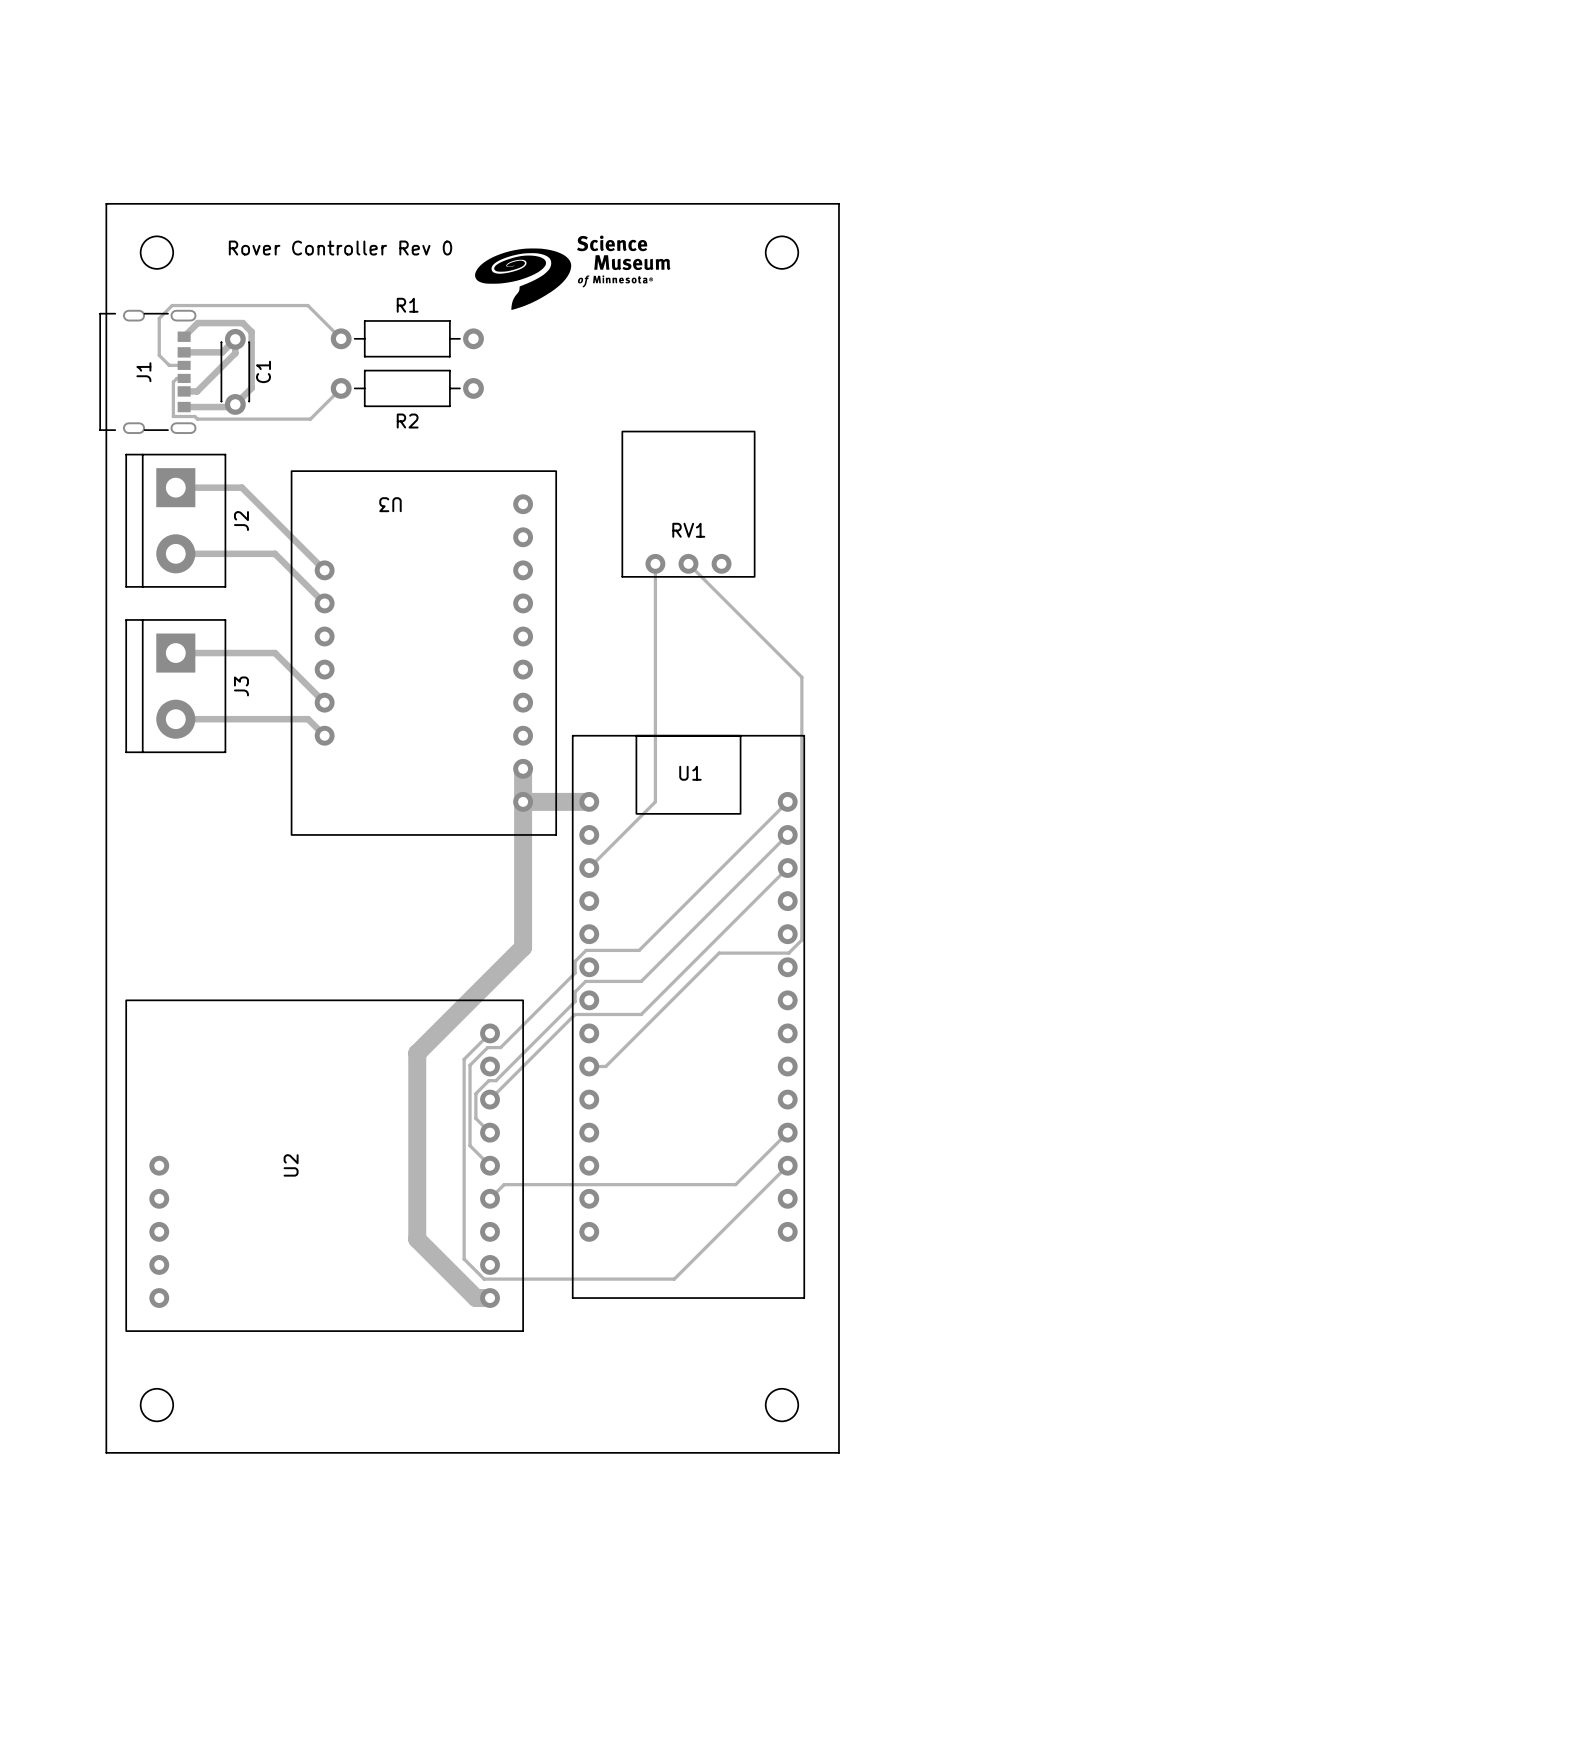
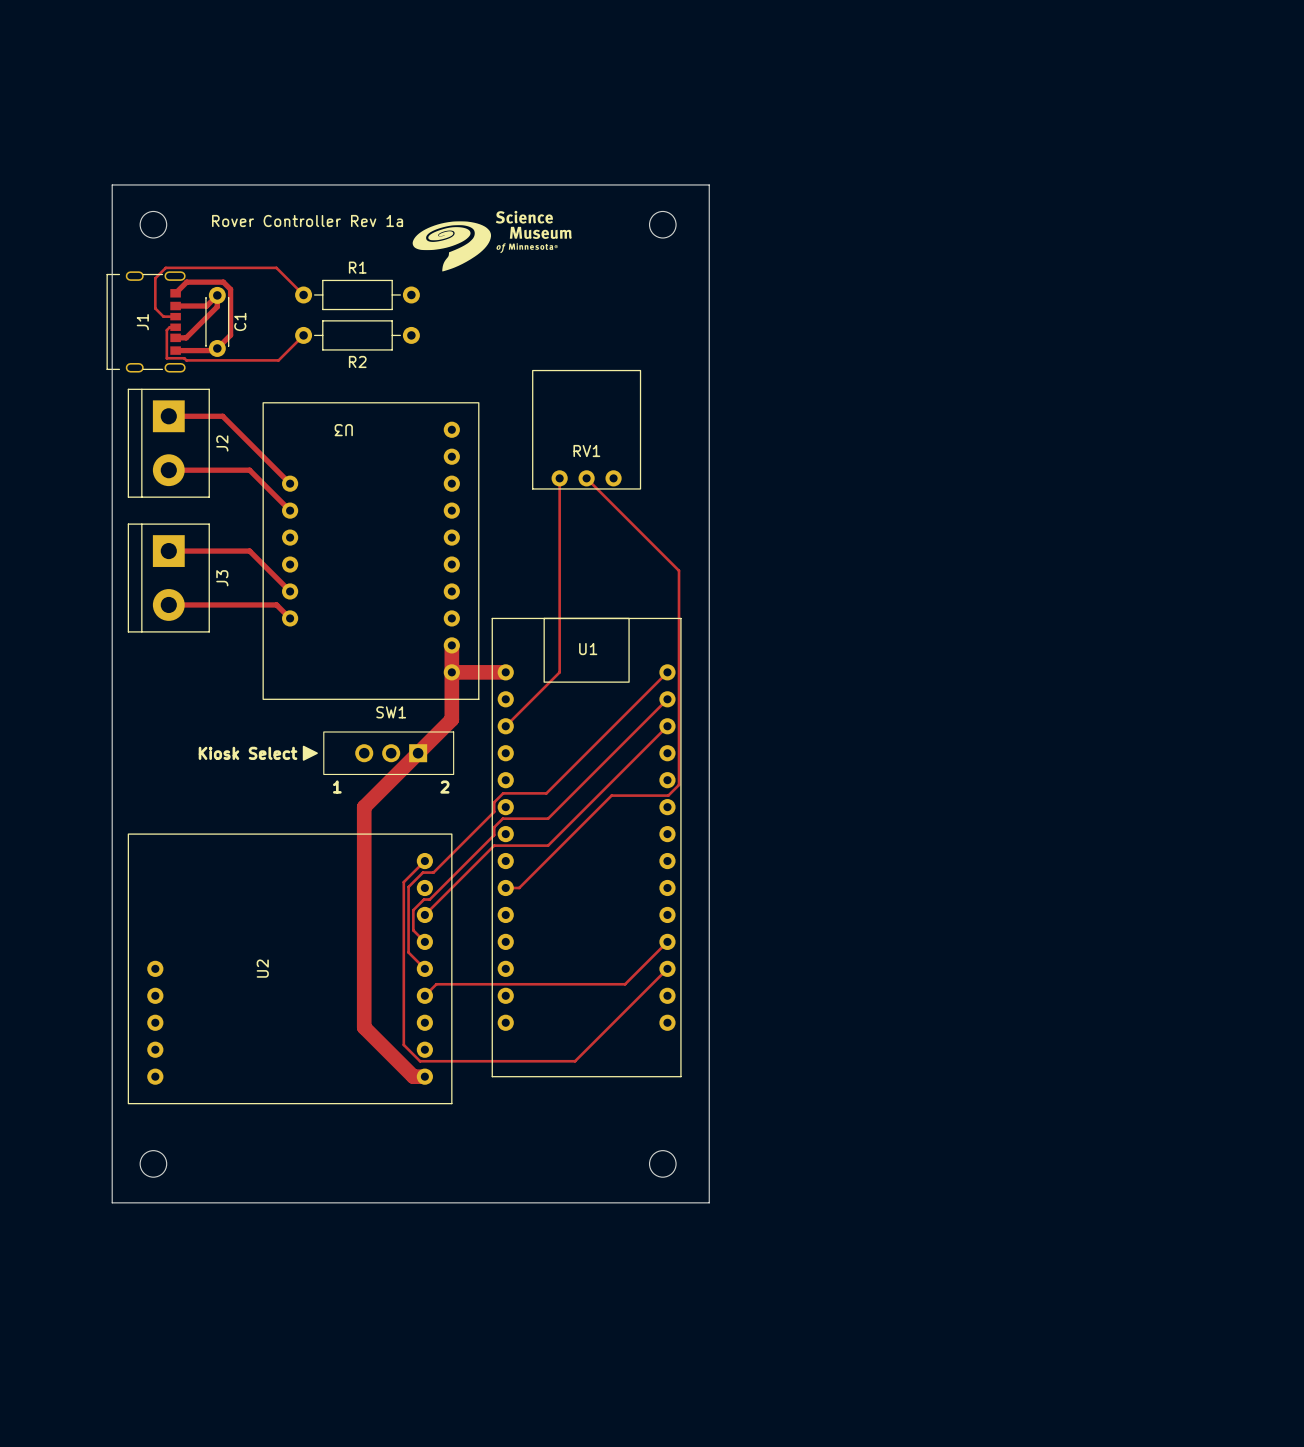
text: Rover Controller Rev 0 (340, 248) -> Rover Controller Rev 1a (307, 220)
track: (523, 859) (523, 947) (417, 1053) (417, 1239) -> (451, 719) (364, 807) (365, 1028)
drawing: none -> [302, 745, 318, 761]
text: none -> Kiosk Select (248, 753)
SW1: none -> (388, 753)
text: none -> 1 (337, 787)
text: none -> 2 (444, 787)

